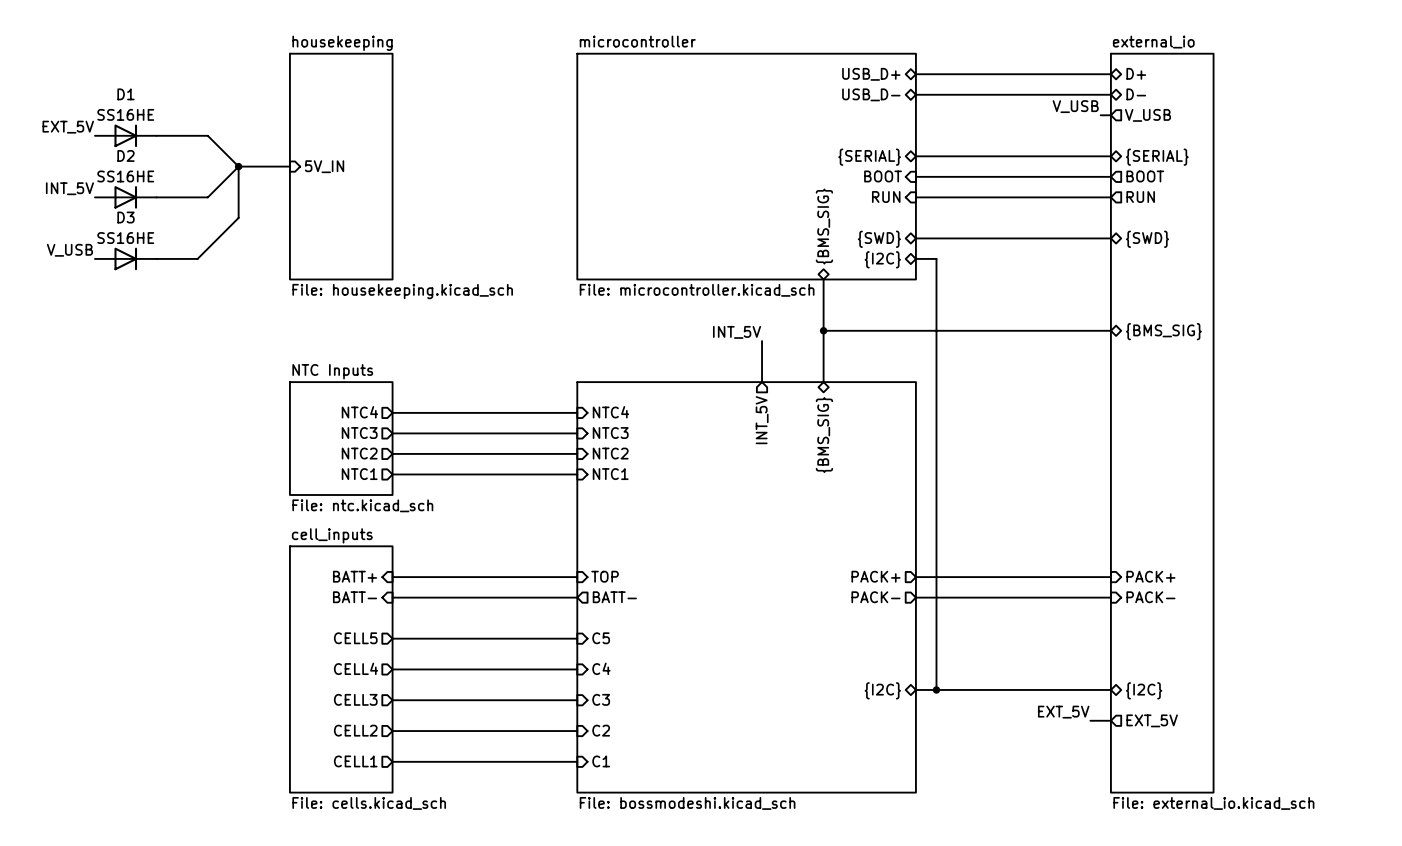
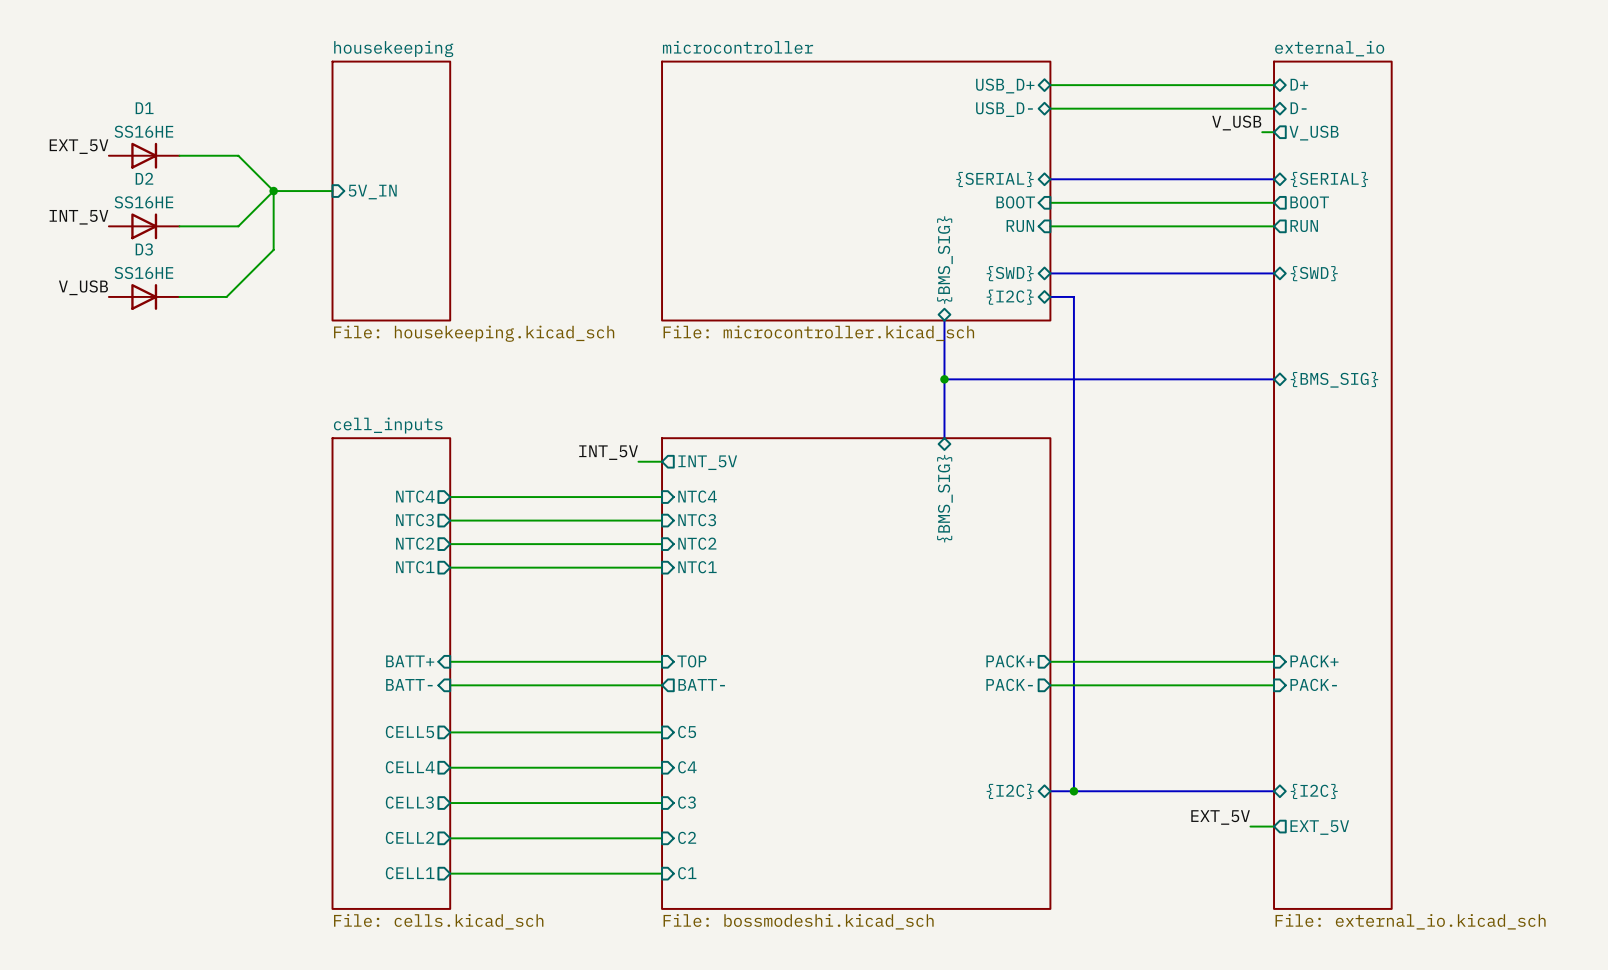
label: INT_5V (737, 332) -> none
wire: (762, 341) (762, 382) -> none
label: none -> INT_5V (608, 452)
wire: none -> (638, 461) (662, 461)
sheet pin: NTC4 (359, 412) -> none
wire: (392, 412) (577, 412) -> (450, 567) (662, 567)
sheet pin: NTC4 (610, 412) -> none
sheet pin rotation: 0° (762, 420) -> 90° counterclockwise (707, 462)
sheet pin position: INT_5V (762, 420) -> INT_5V (707, 462)
sheet pin: NTC3 (359, 433) -> NTC4 (415, 496)
sheet pin: NTC3 (610, 433) -> NTC4 (697, 496)
sheet NTC Inputs: File: ntc.kicad_sch (341, 438) -> none
sheet pin: NTC2 (359, 453) -> NTC3 (415, 520)
sheet pin: NTC2 (610, 453) -> NTC3 (697, 520)
sheet pin: NTC1 (359, 474) -> NTC2 (415, 543)
sheet pin: NTC1 (610, 474) -> NTC2 (697, 543)
sheet pin: none -> NTC1 (415, 567)
sheet pin: none -> NTC1 (697, 567)
sheet cell_inputs: none -> File: cells.kicad_sch (391, 673)
sheet cell_inputs: File: cells.kicad_sch (341, 669) -> none

